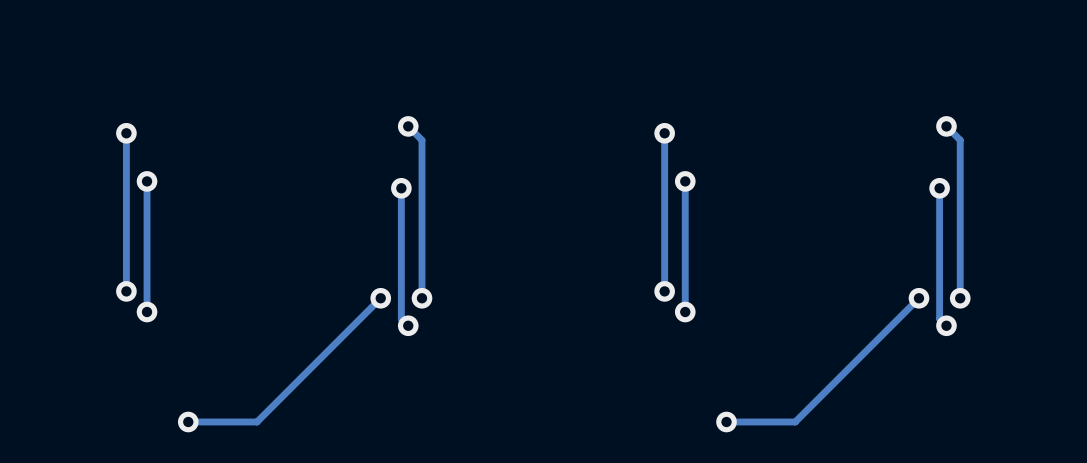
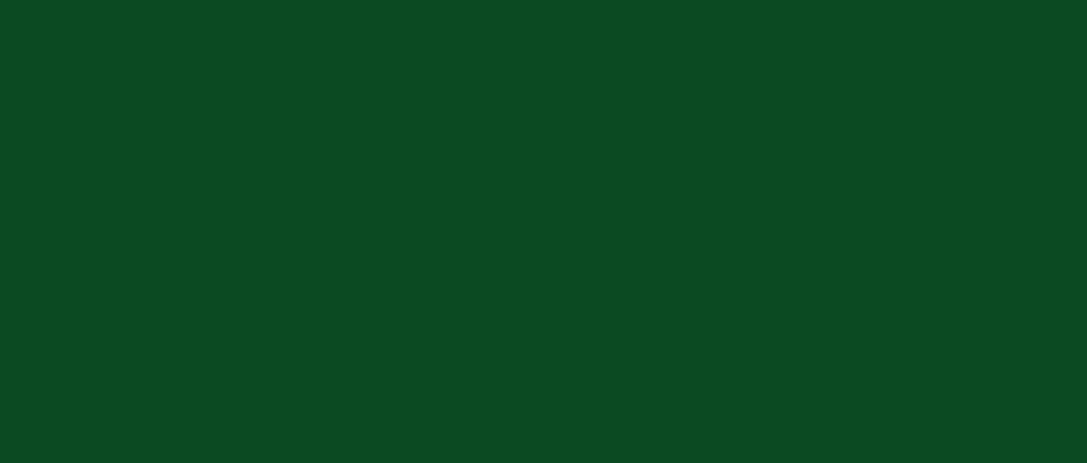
track: (408, 126) (421, 140) (421, 298) -> none
via: (408, 126) -> none
track: (946, 126) (960, 140) (960, 298) -> none
via: (946, 126) -> none
track: (126, 133) (126, 291) -> none
via: (126, 133) -> none
track: (664, 133) (664, 291) -> none
via: (664, 133) -> none
track: (147, 181) (147, 312) -> none
via: (147, 181) -> none
track: (685, 181) (685, 312) -> none
via: (685, 181) -> none
track: (401, 188) (401, 318) (408, 325) -> none
via: (401, 188) -> none
track: (939, 188) (939, 318) (946, 325) -> none
via: (939, 188) -> none
via: (126, 291) -> none
via: (664, 291) -> none
track: (380, 298) (257, 421) (188, 421) -> none
via: (380, 298) -> none
via: (421, 298) -> none
track: (918, 298) (795, 421) (726, 421) -> none
via: (918, 298) -> none
via: (960, 298) -> none
via: (147, 312) -> none
via: (685, 312) -> none
via: (408, 325) -> none
via: (946, 325) -> none
via: (188, 421) -> none
via: (726, 421) -> none

